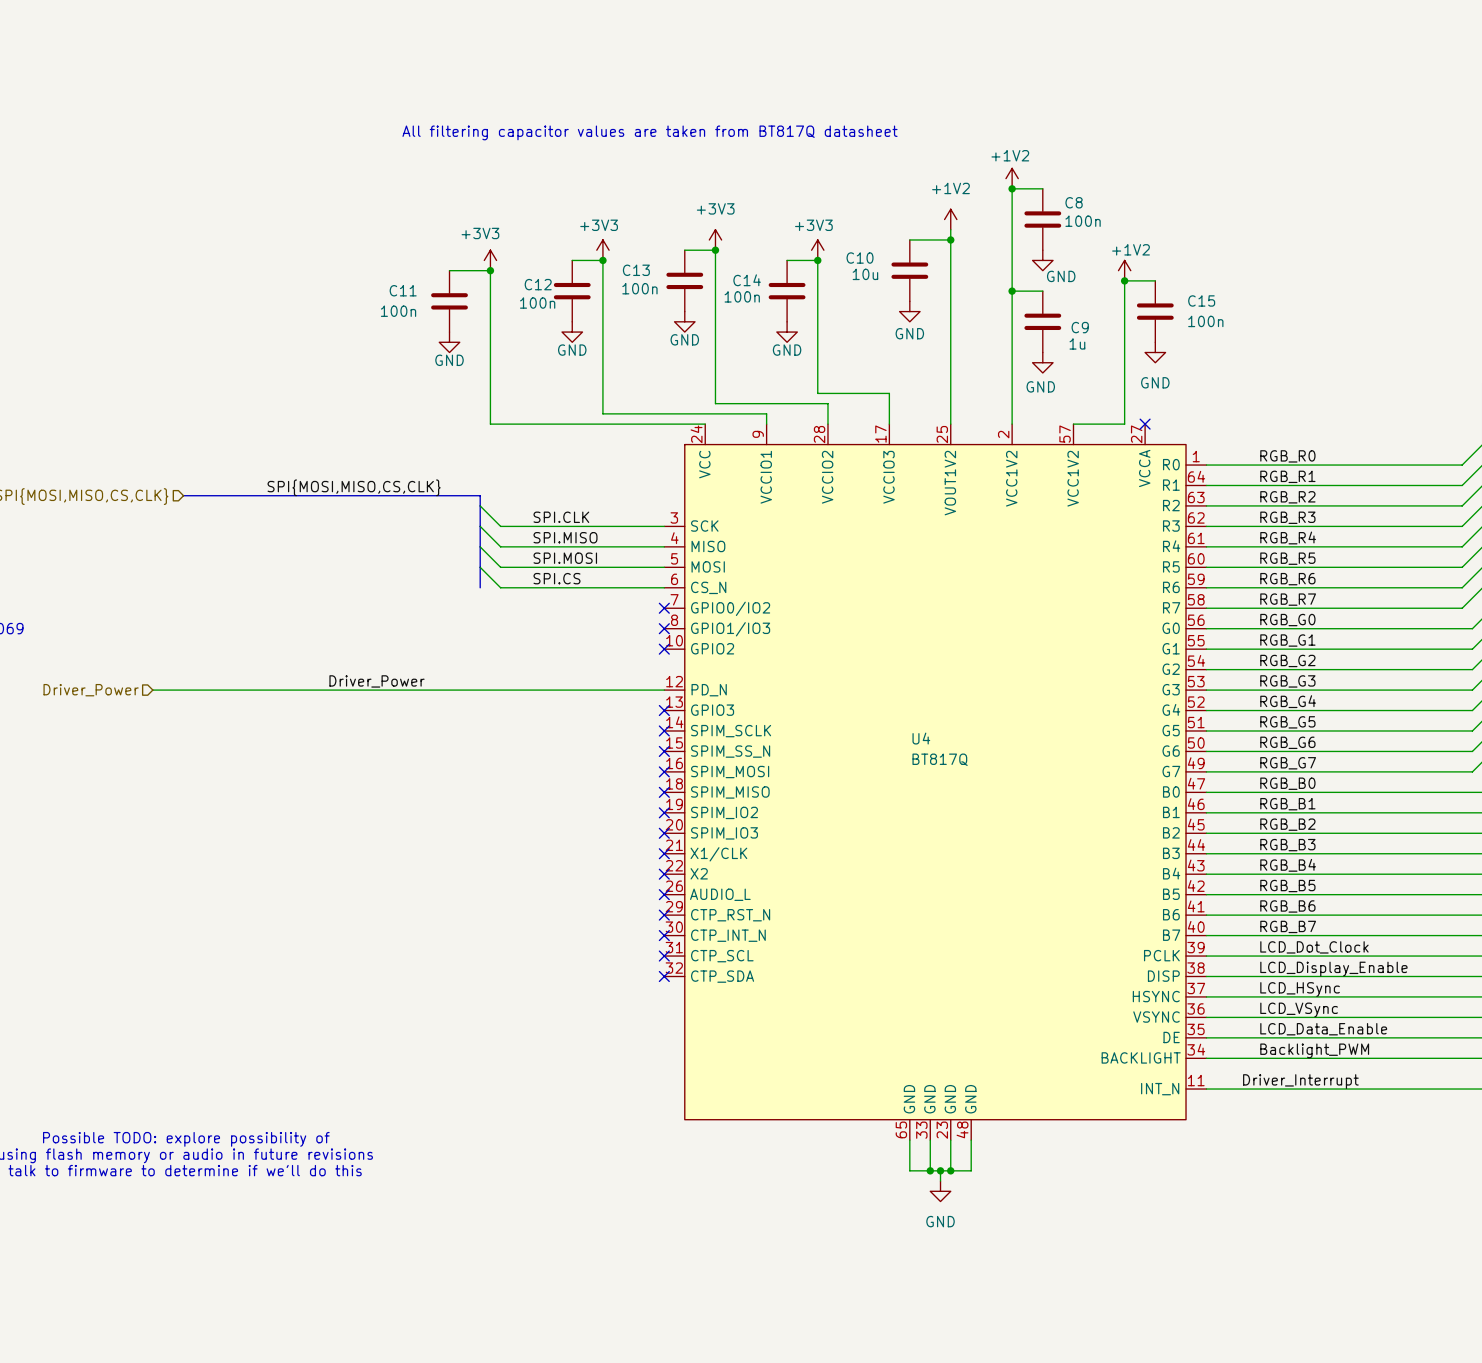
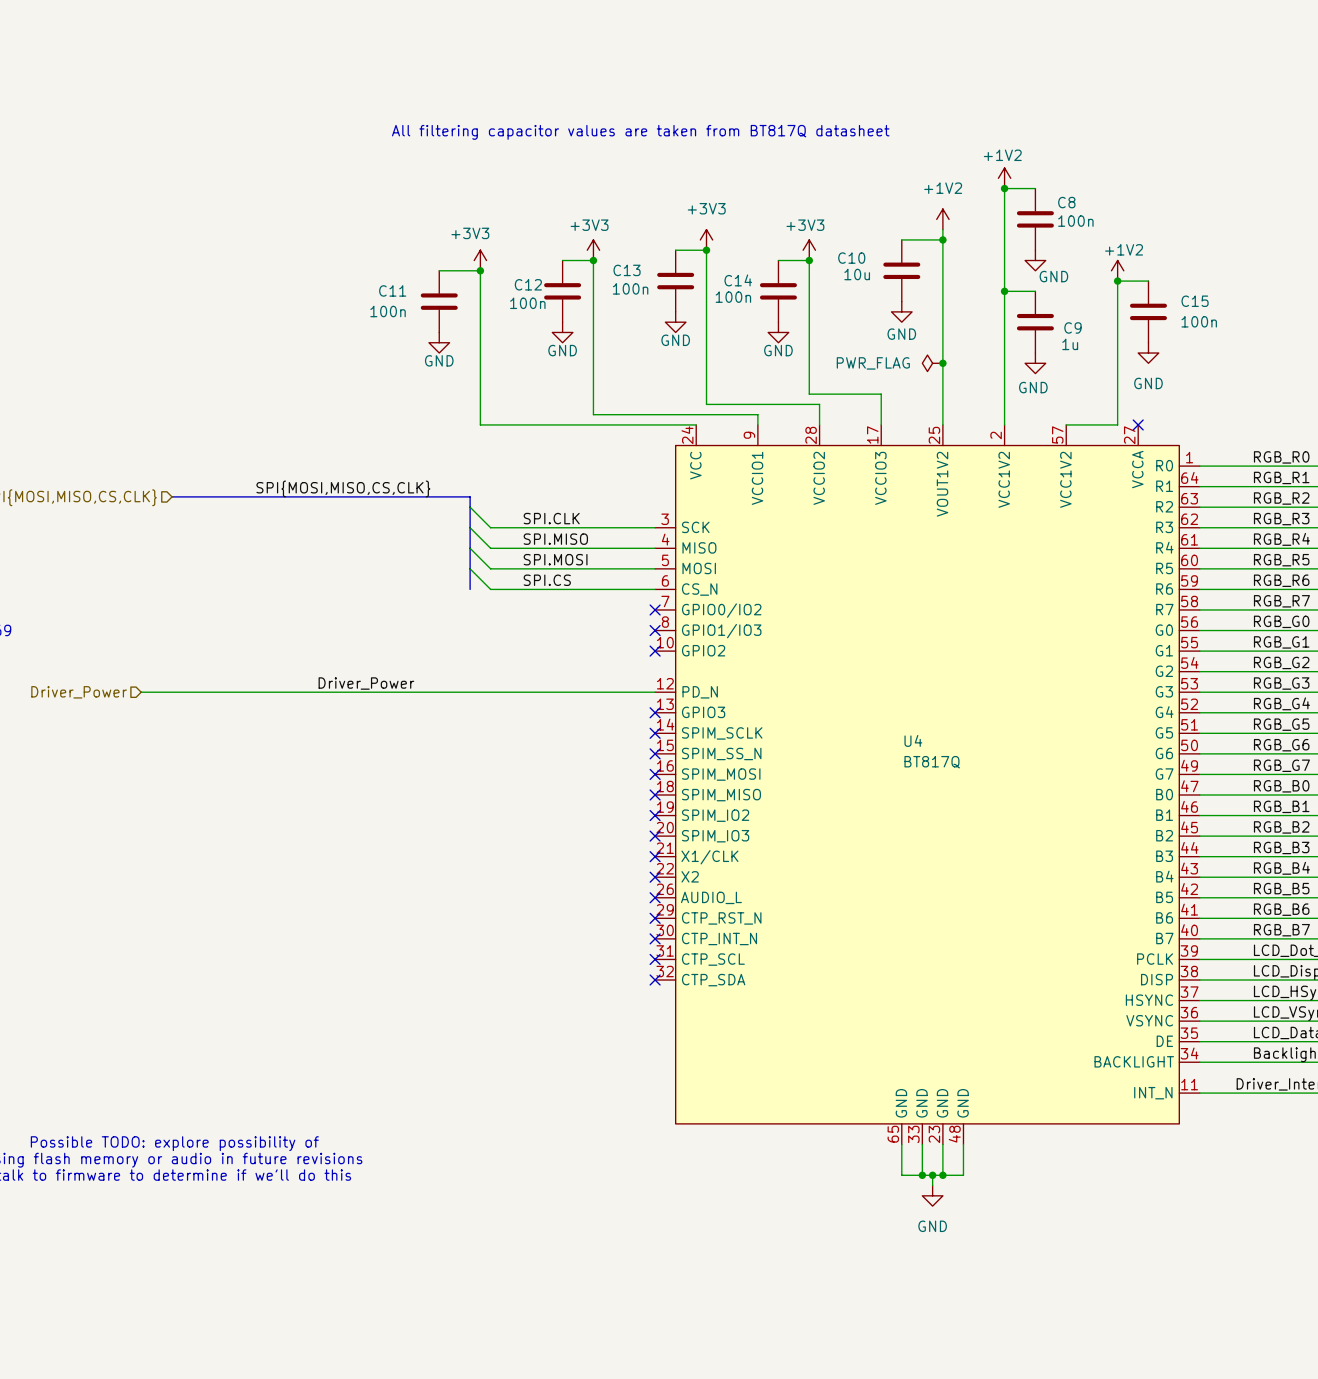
power symbol: none -> PWR_FLAG (932, 363)
junction: none -> (942, 363)

